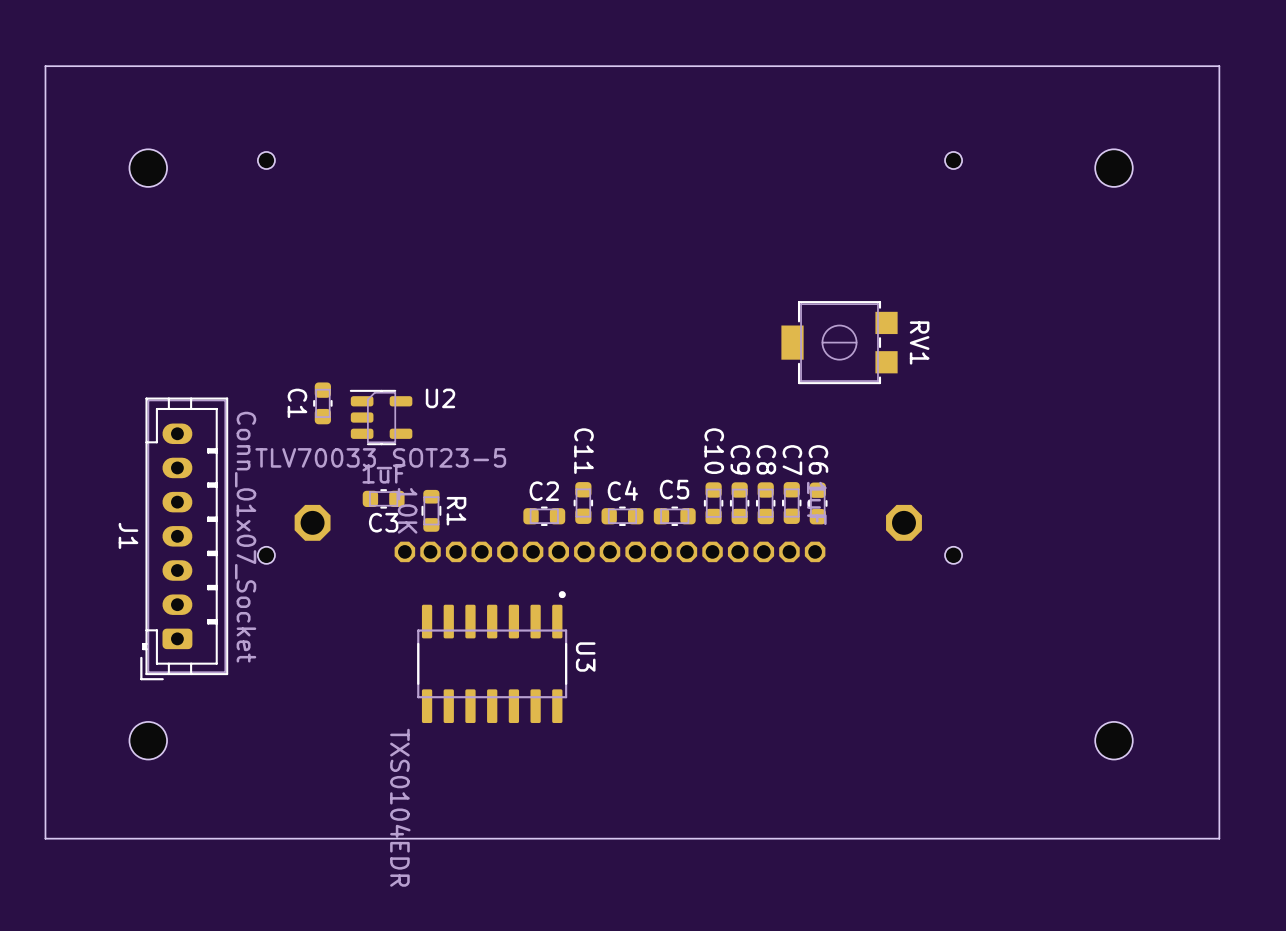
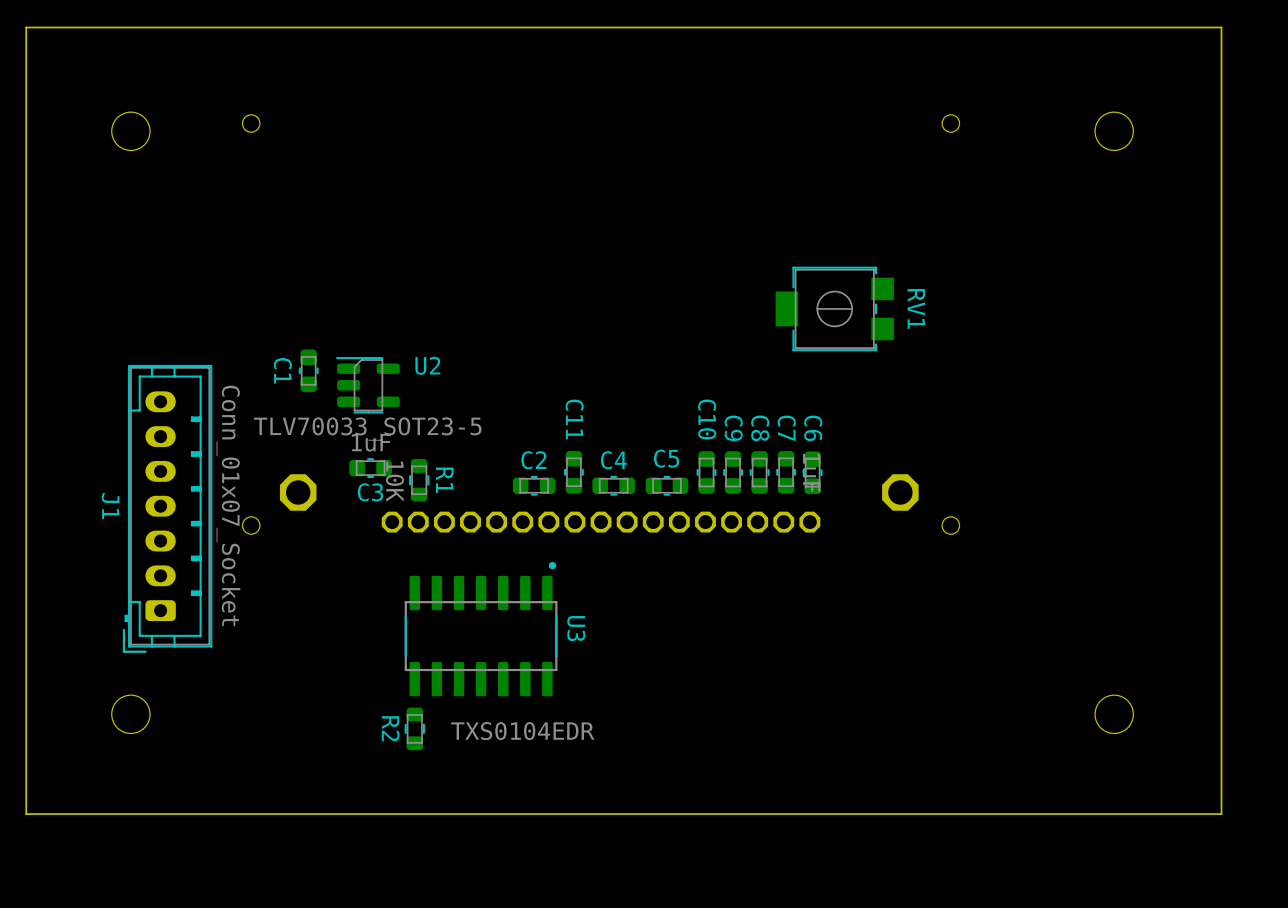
R2: none -> (414, 728)
U3 value rotation: 0° (400, 807) -> 90° counterclockwise (522, 731)

